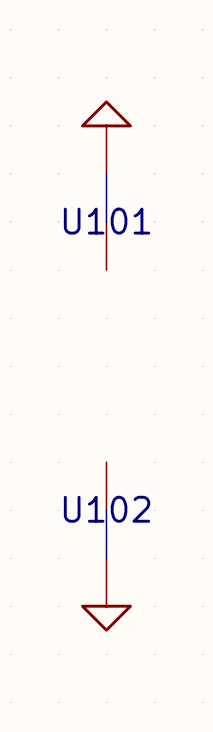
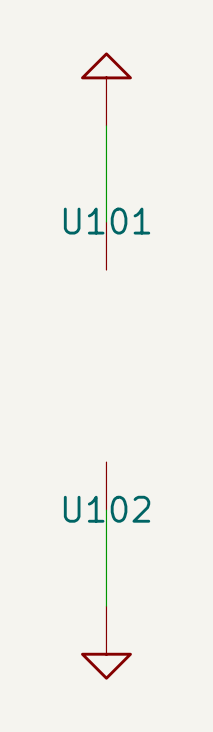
power symbol position: (106, 137) -> (106, 89)
power symbol position: (106, 594) -> (106, 642)

